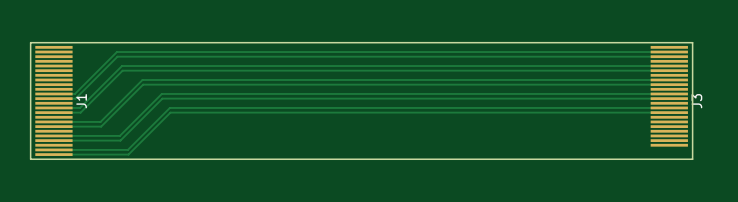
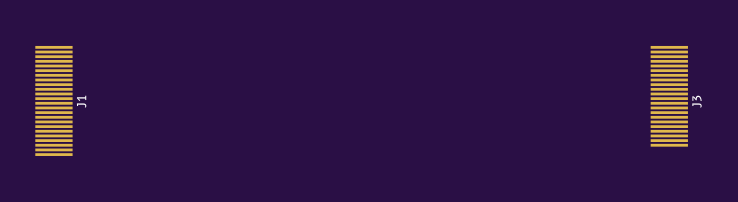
board edge: (30, 42) (692, 42) (692, 159) (30, 159) (30, 42) -> none
track: (669, 52) (116, 52) (74, 93) (53, 93) -> none
track: (669, 56) (117, 56) (75, 98) (53, 98) -> none
track: (669, 66) (122, 66) (80, 107) (53, 107) -> none
track: (669, 70) (122, 70) (80, 112) (53, 112) -> none
track: (669, 79) (142, 79) (100, 121) (53, 121) -> none
track: (669, 84) (143, 84) (101, 126) (53, 126) -> none
track: (669, 93) (161, 93) (119, 135) (53, 135) -> none
track: (669, 98) (162, 98) (120, 140) (53, 140) -> none
track: (669, 107) (169, 107) (127, 149) (53, 149) -> none
track: (669, 112) (170, 112) (128, 154) (53, 154) -> none

